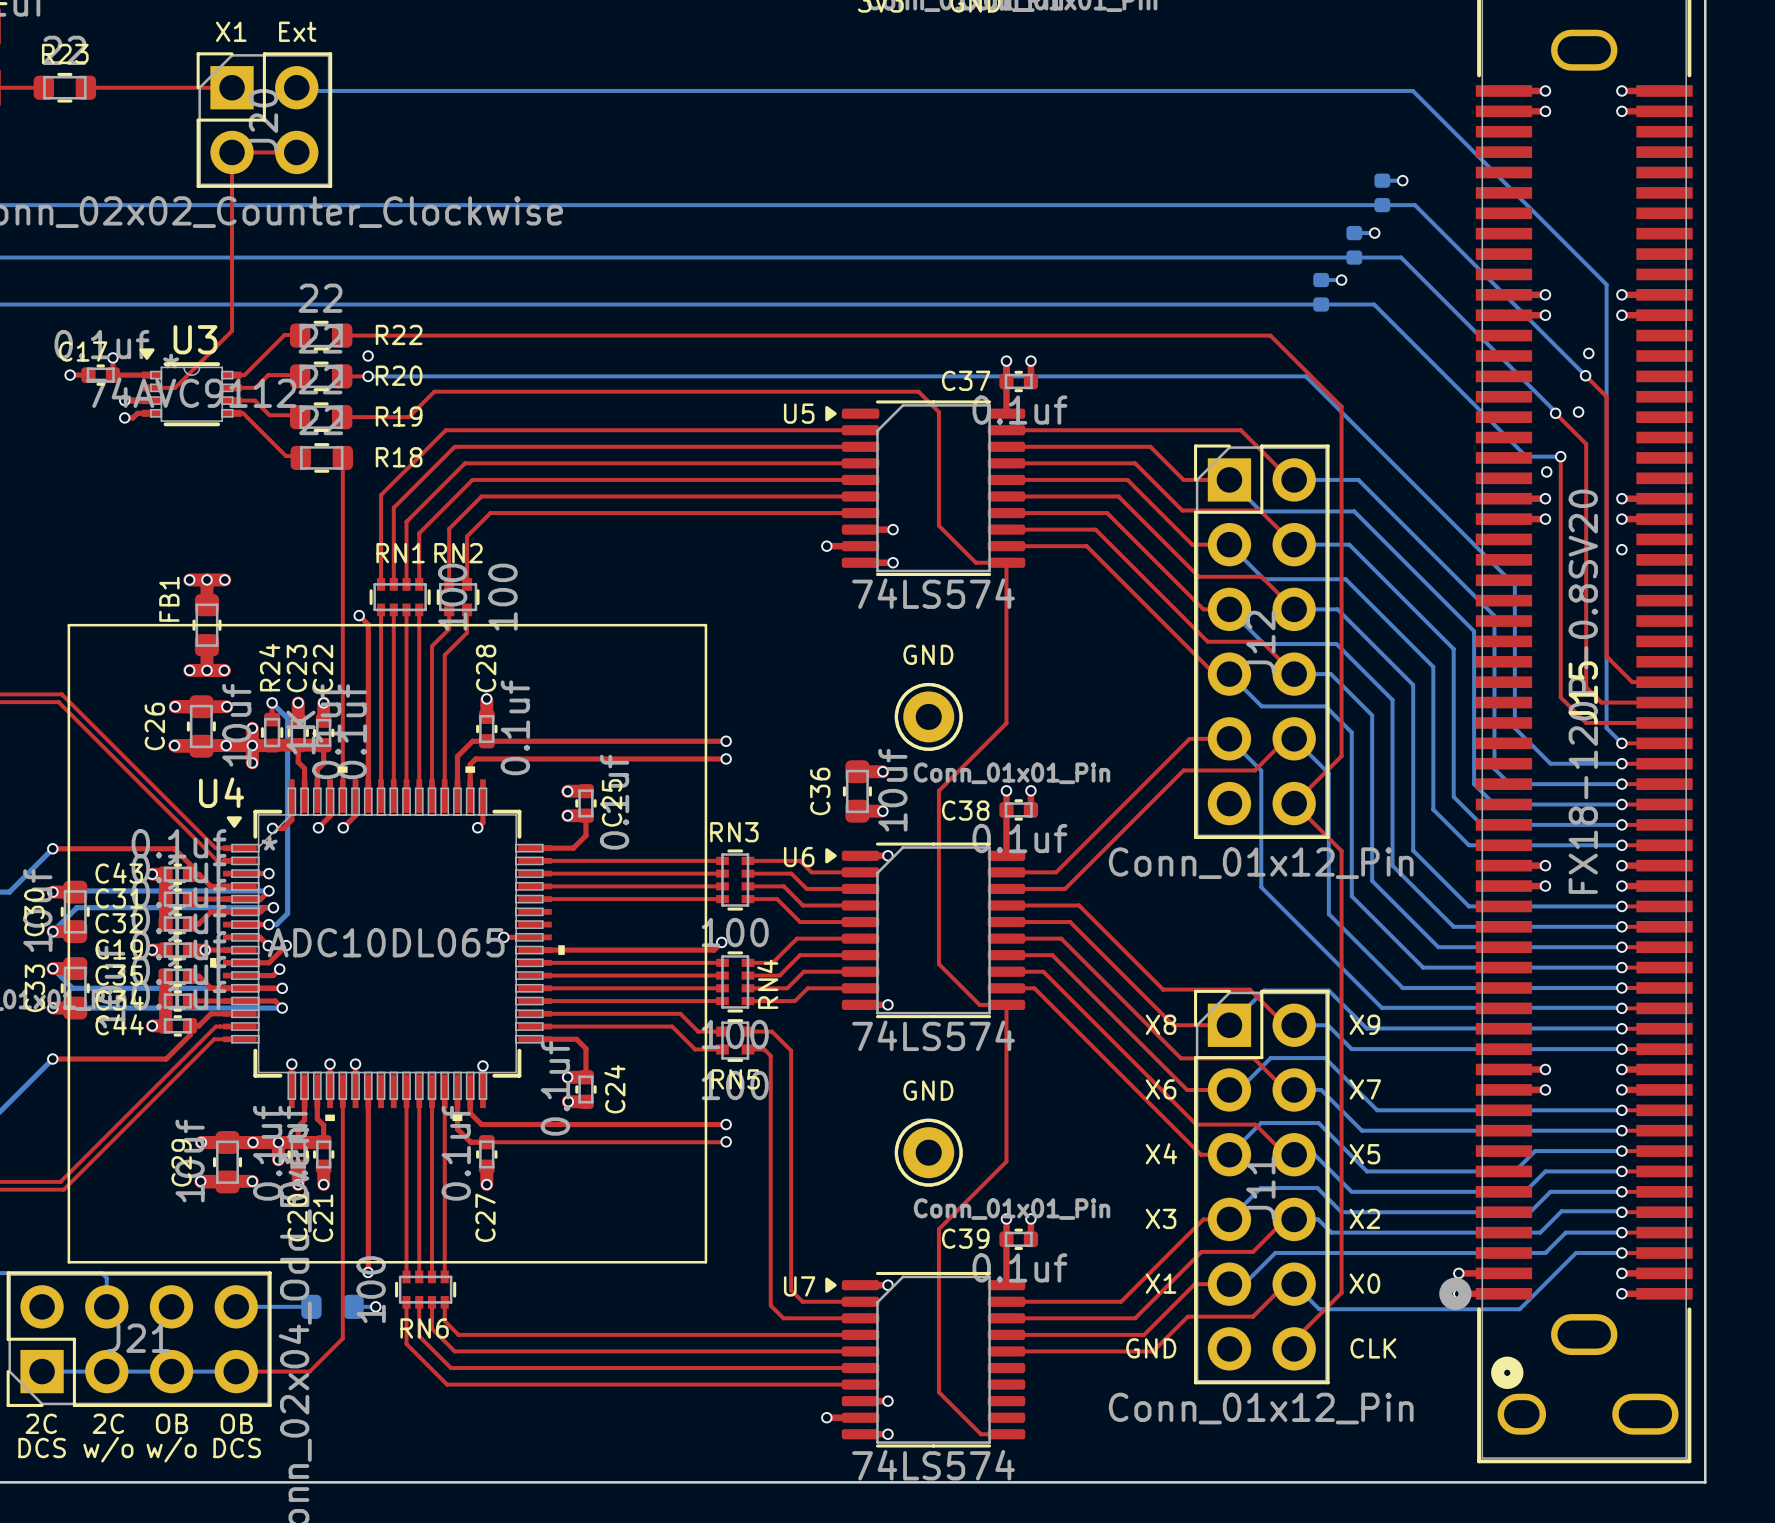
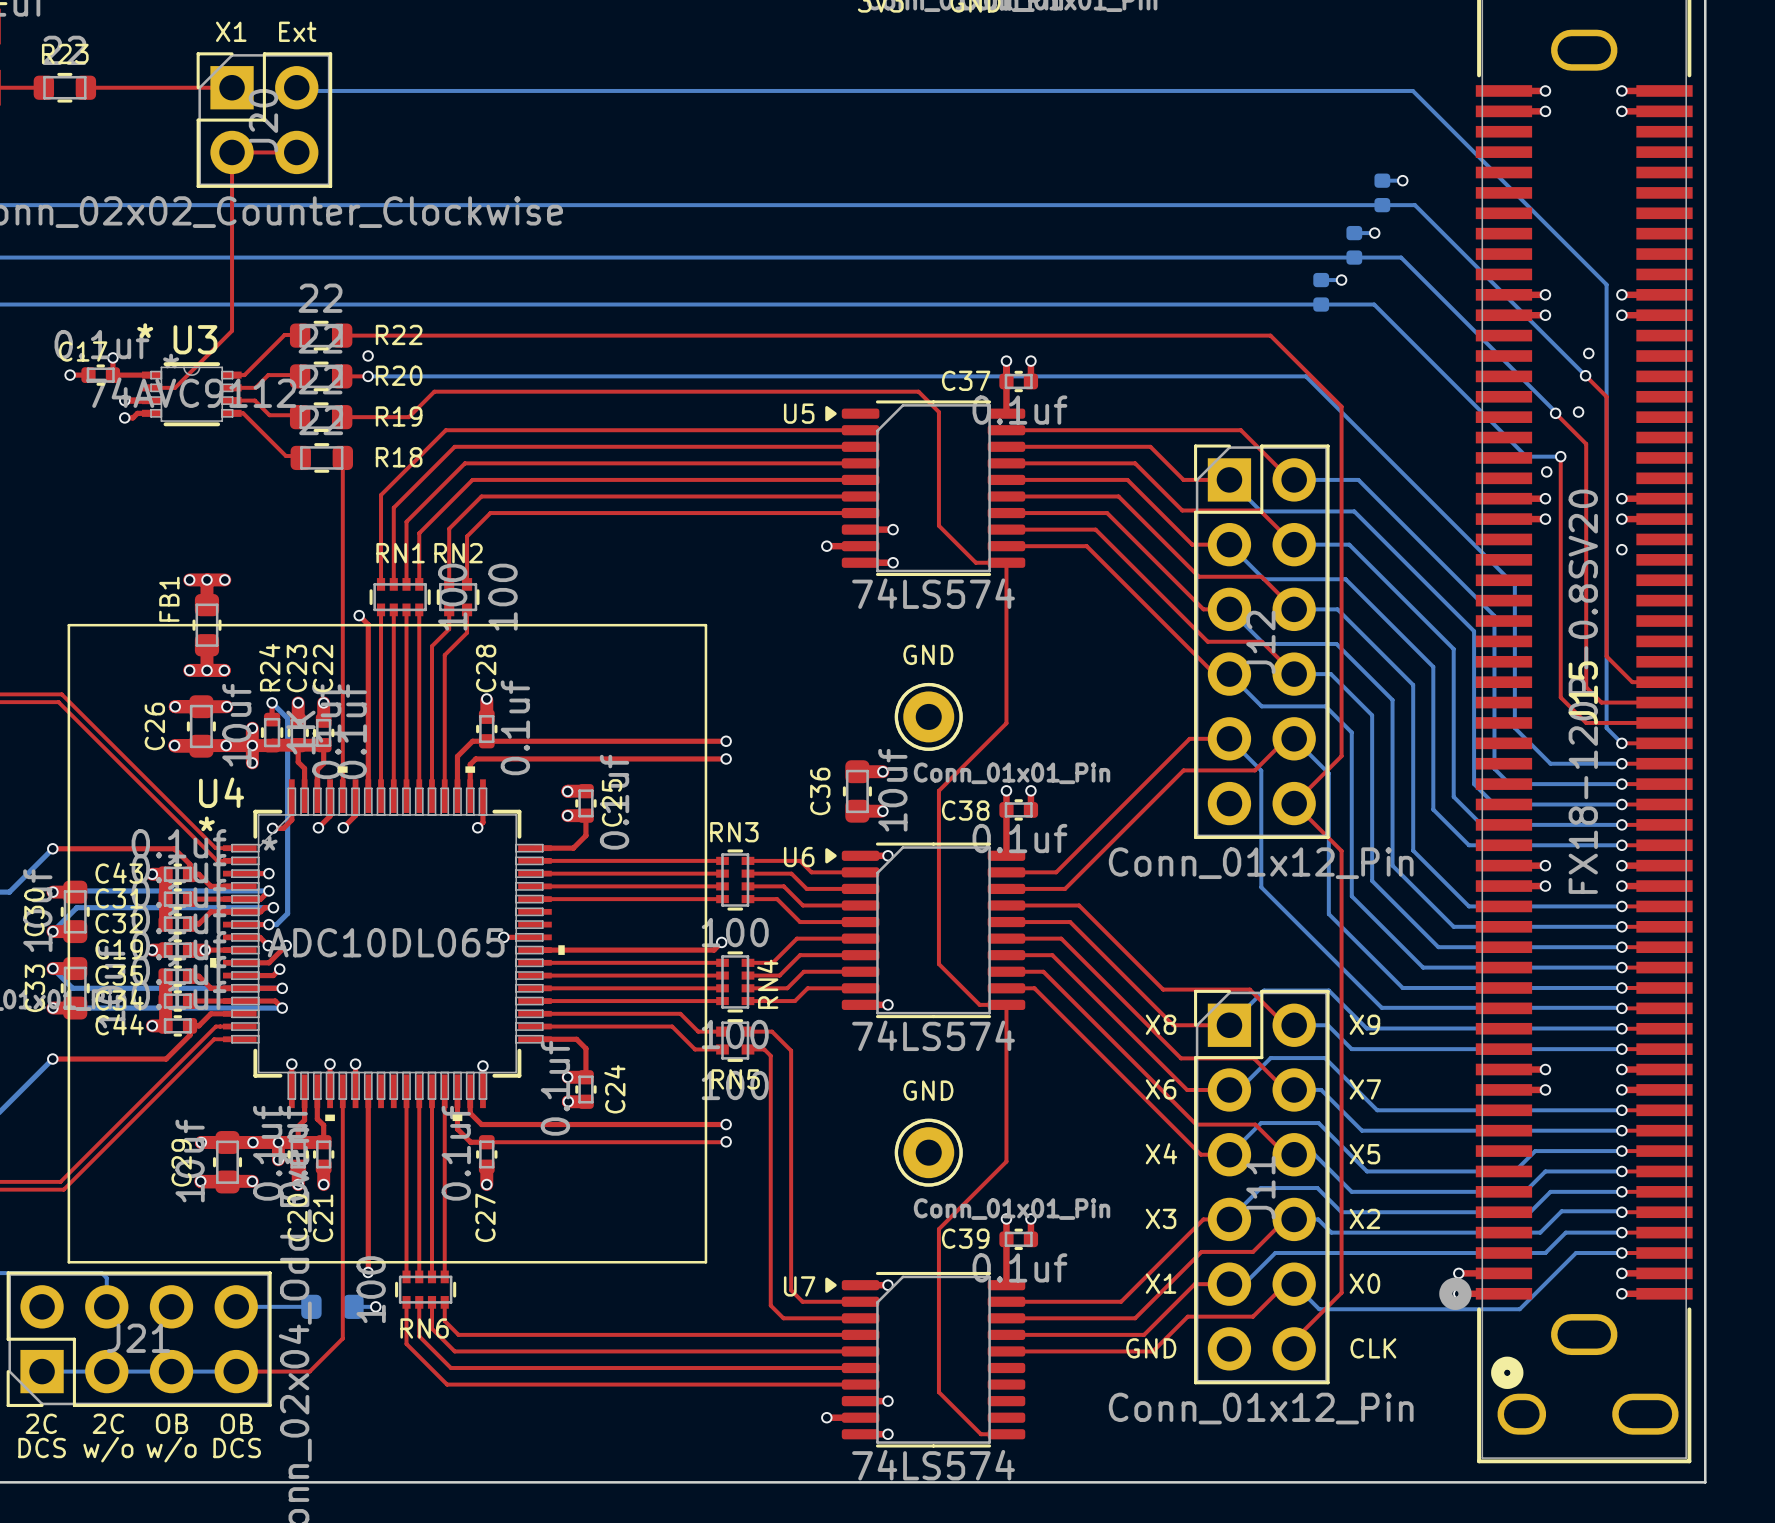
U3 footprint: [139, 348, 242, 427] -> [141, 362, 242, 427]
U4 footprint: [210, 766, 565, 1122] -> [210, 766, 565, 1122]

